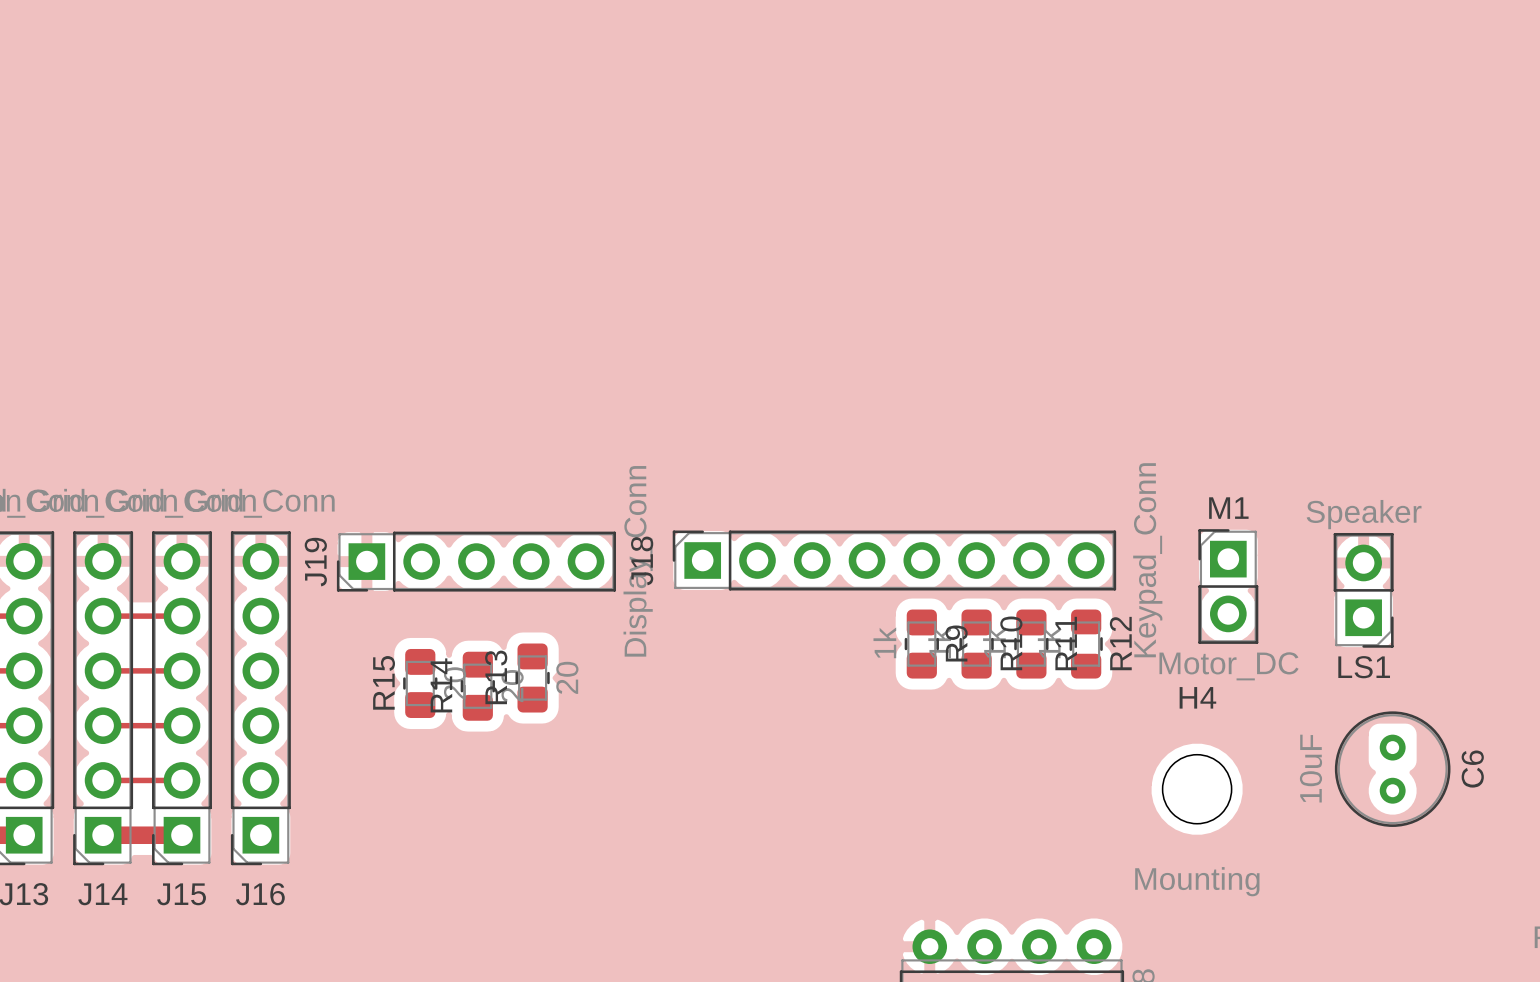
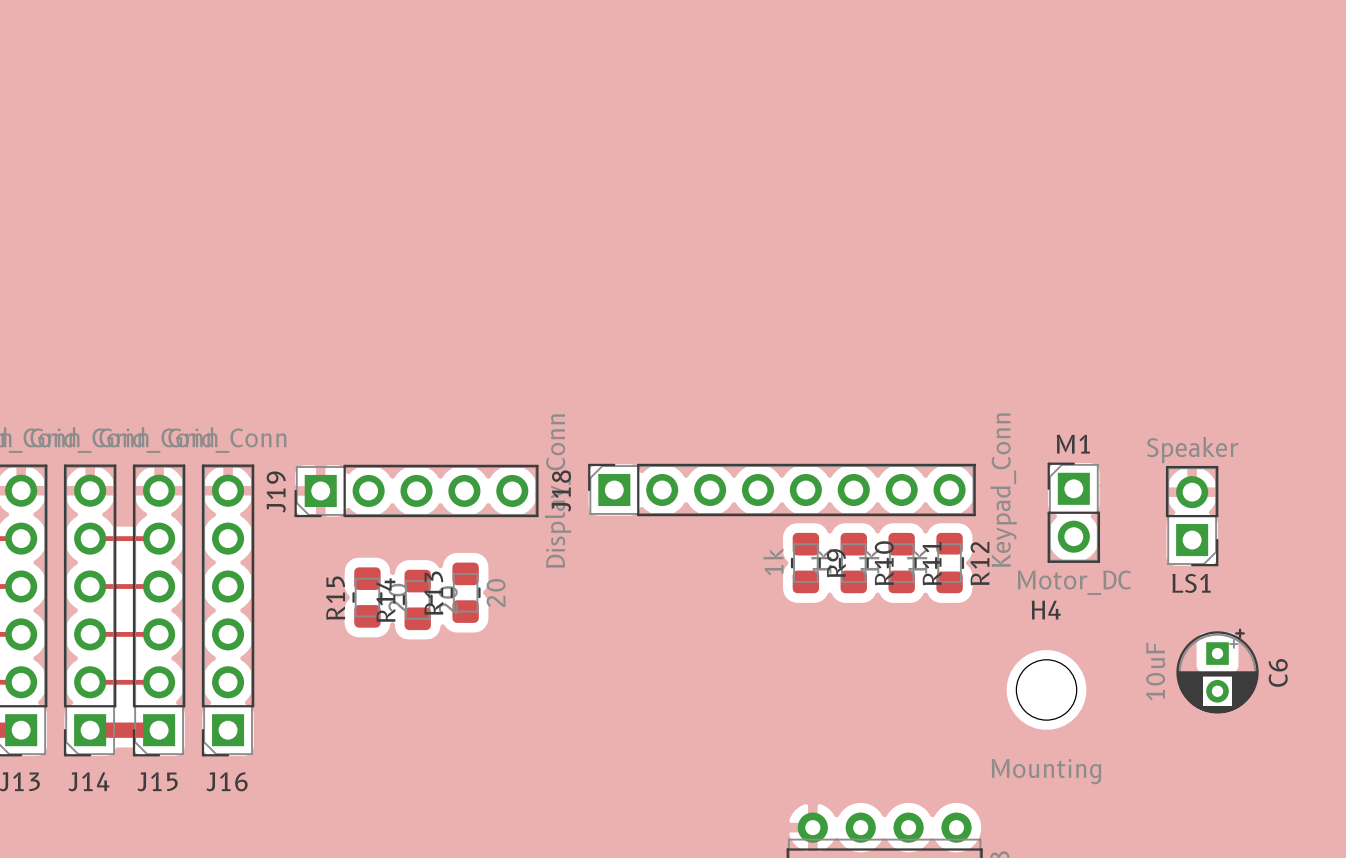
C6 footprint: [1334, 711, 1451, 827] -> [1176, 628, 1259, 714]

